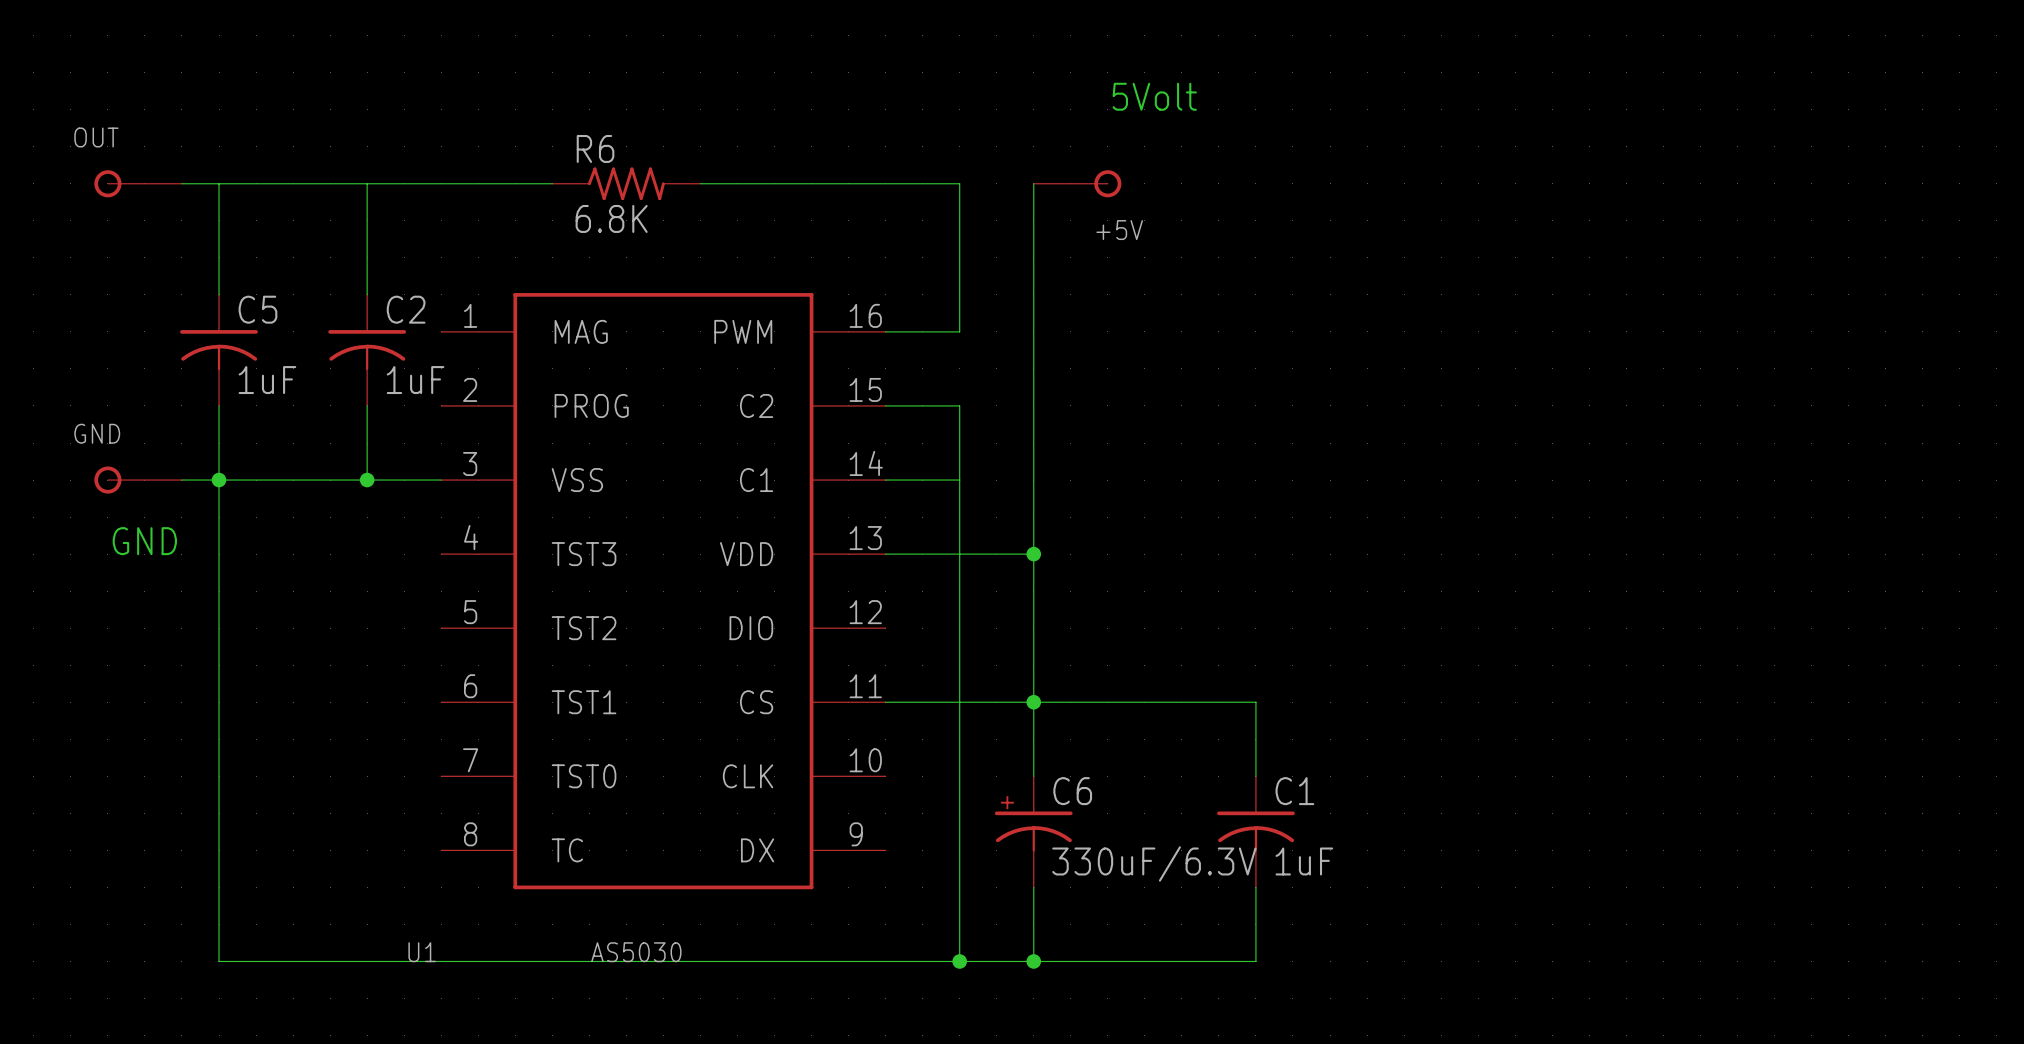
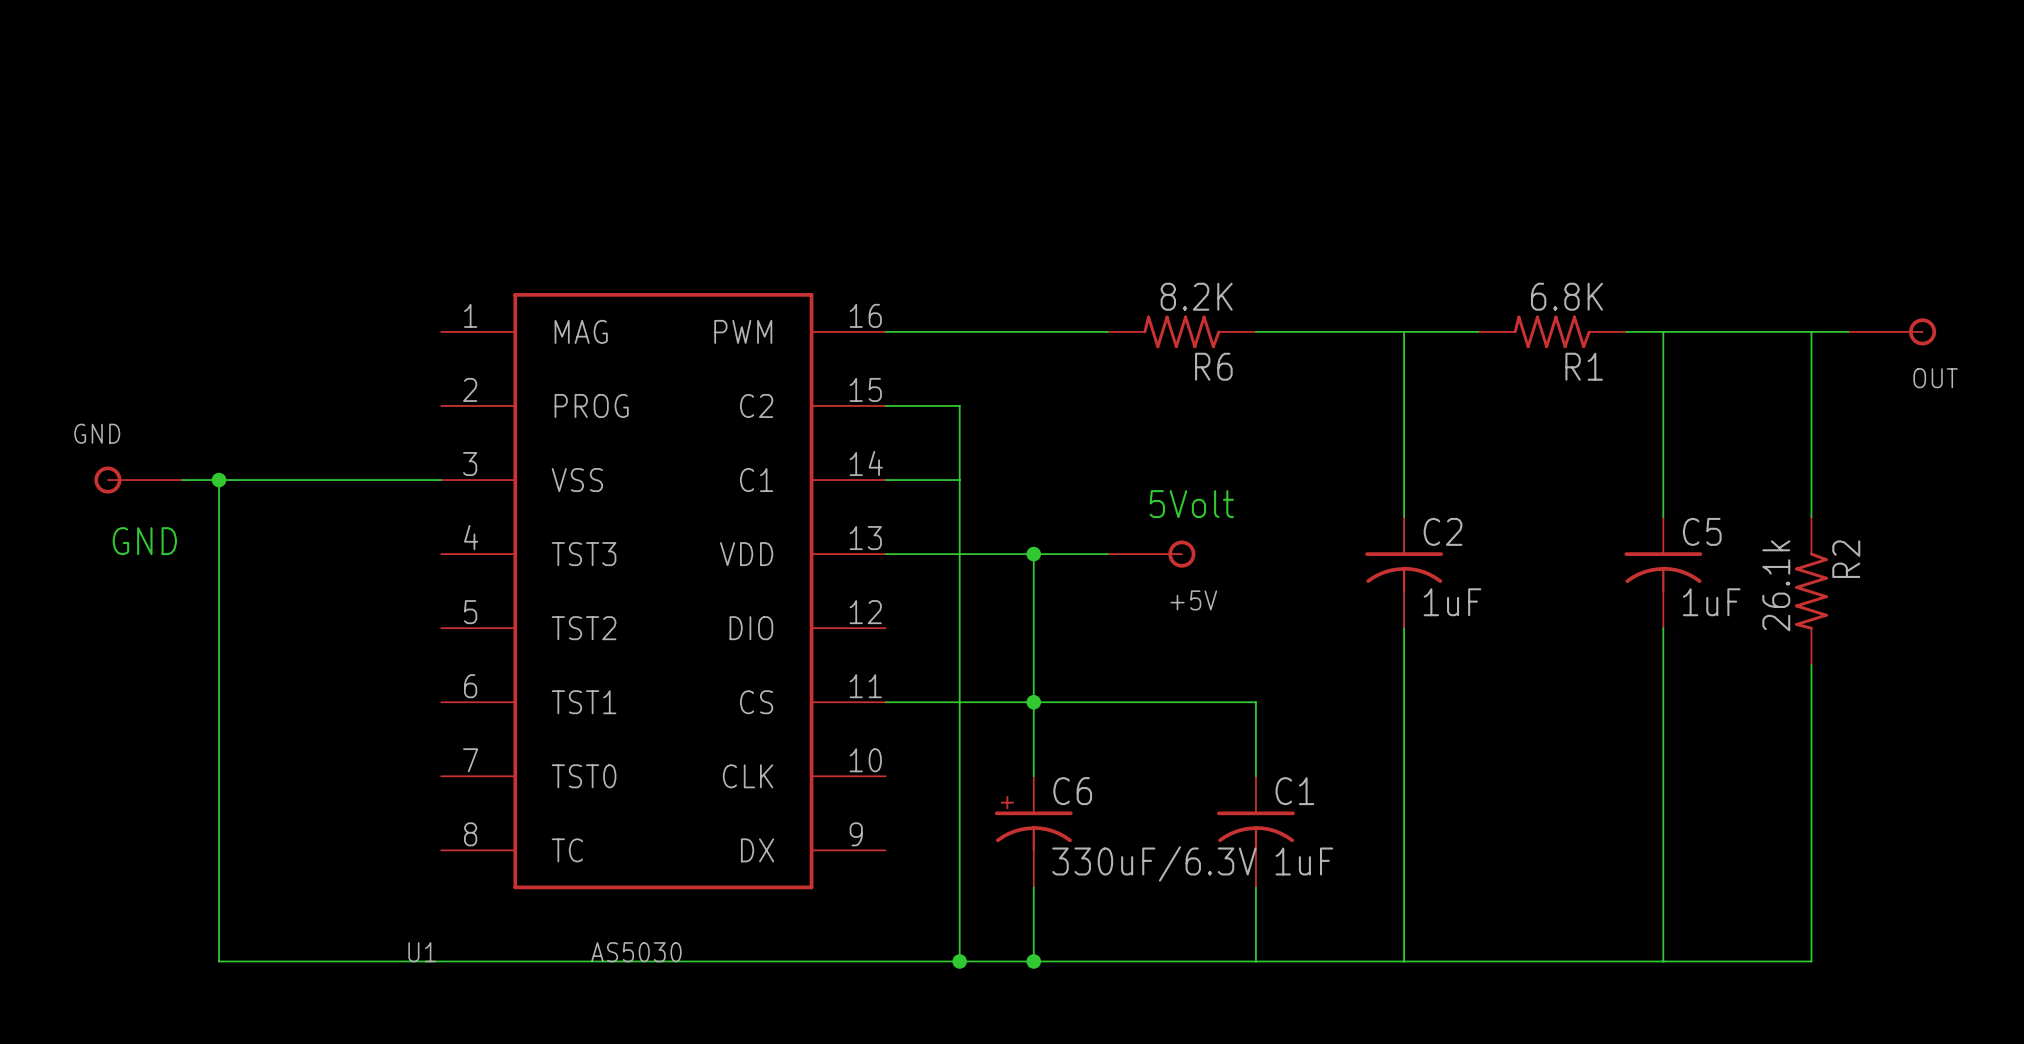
text: 5Volt (1154, 96) -> none
OUT: (138, 183) -> none
wire: (181, 183) (552, 183) -> none
wire: (219, 183) (219, 294) -> none
wire: (367, 183) (367, 294) -> none
R6 rotation: 0° (626, 183) -> 180° (1181, 331)
R6 position: (626, 183) -> (1181, 331)
wire: (700, 183) (959, 183) (959, 331) -> (1107, 331) (959, 331)
wire: (1033, 183) (1033, 554) -> (1107, 554) (1033, 554)
+5V position: (1077, 183) -> (1151, 554)
R6 value: 6.8K (611, 218) -> 8.2K (1196, 296)
wire: none -> (1255, 331) (1478, 331)
wire: none -> (1404, 331) (1404, 517)
R1: none -> 6.8K (1552, 331)
wire: none -> (1626, 331) (1848, 331)
wire: none -> (1663, 331) (1663, 517)
wire: none -> (1811, 331) (1811, 517)
OUT: none -> (1892, 331)
C5 position: (219, 350) -> (1663, 572)
C2 position: (367, 350) -> (1404, 572)
wire: (219, 405) (219, 480) -> none
wire: (367, 405) (367, 480) -> none
junction: (367, 480) -> none
text: none -> 5Volt (1191, 504)
R2: none -> 26.1k (1811, 591)
wire: none -> (1404, 628) (1404, 961)
wire: none -> (1663, 628) (1663, 961)
wire: none -> (1811, 665) (1811, 961) (1255, 961)

